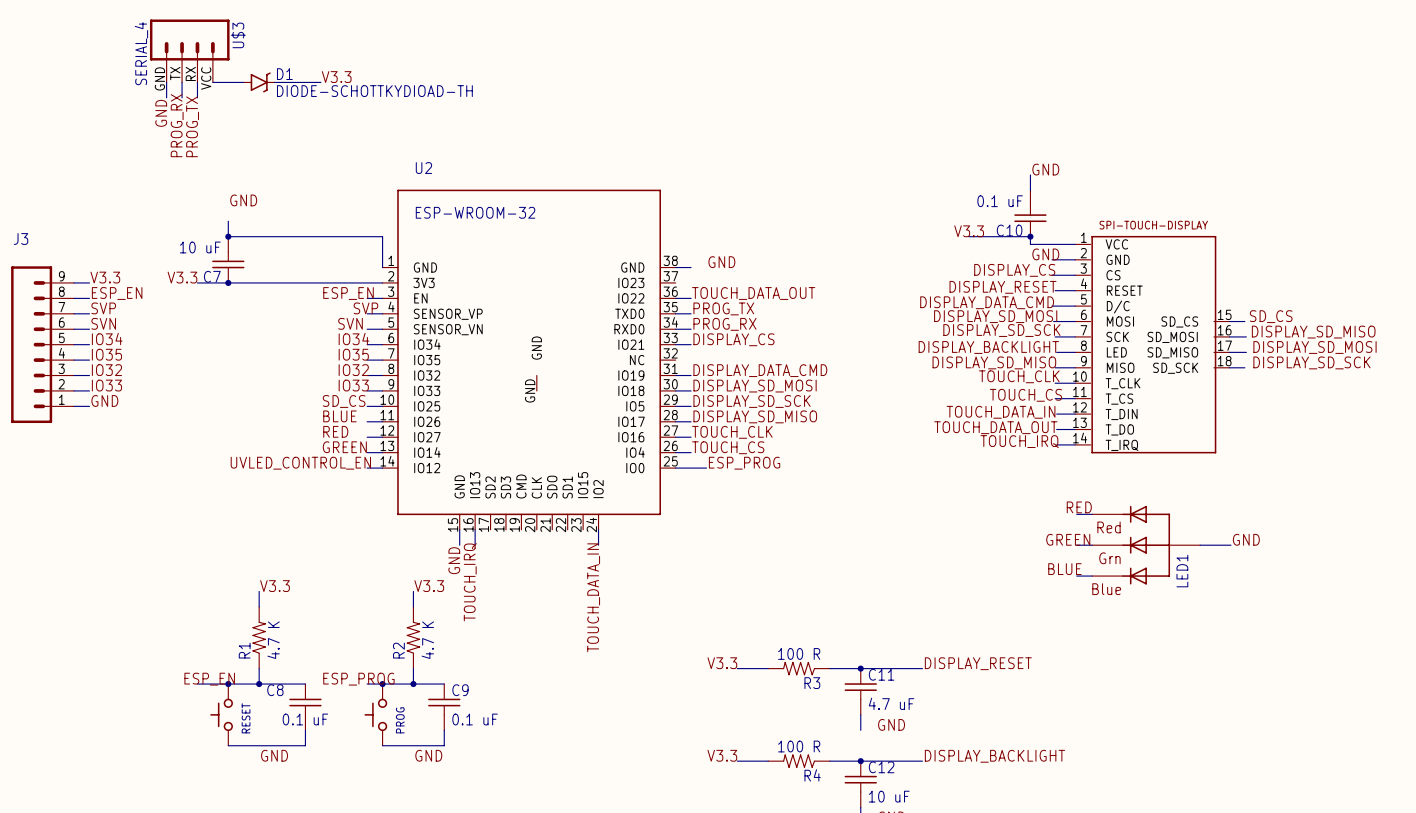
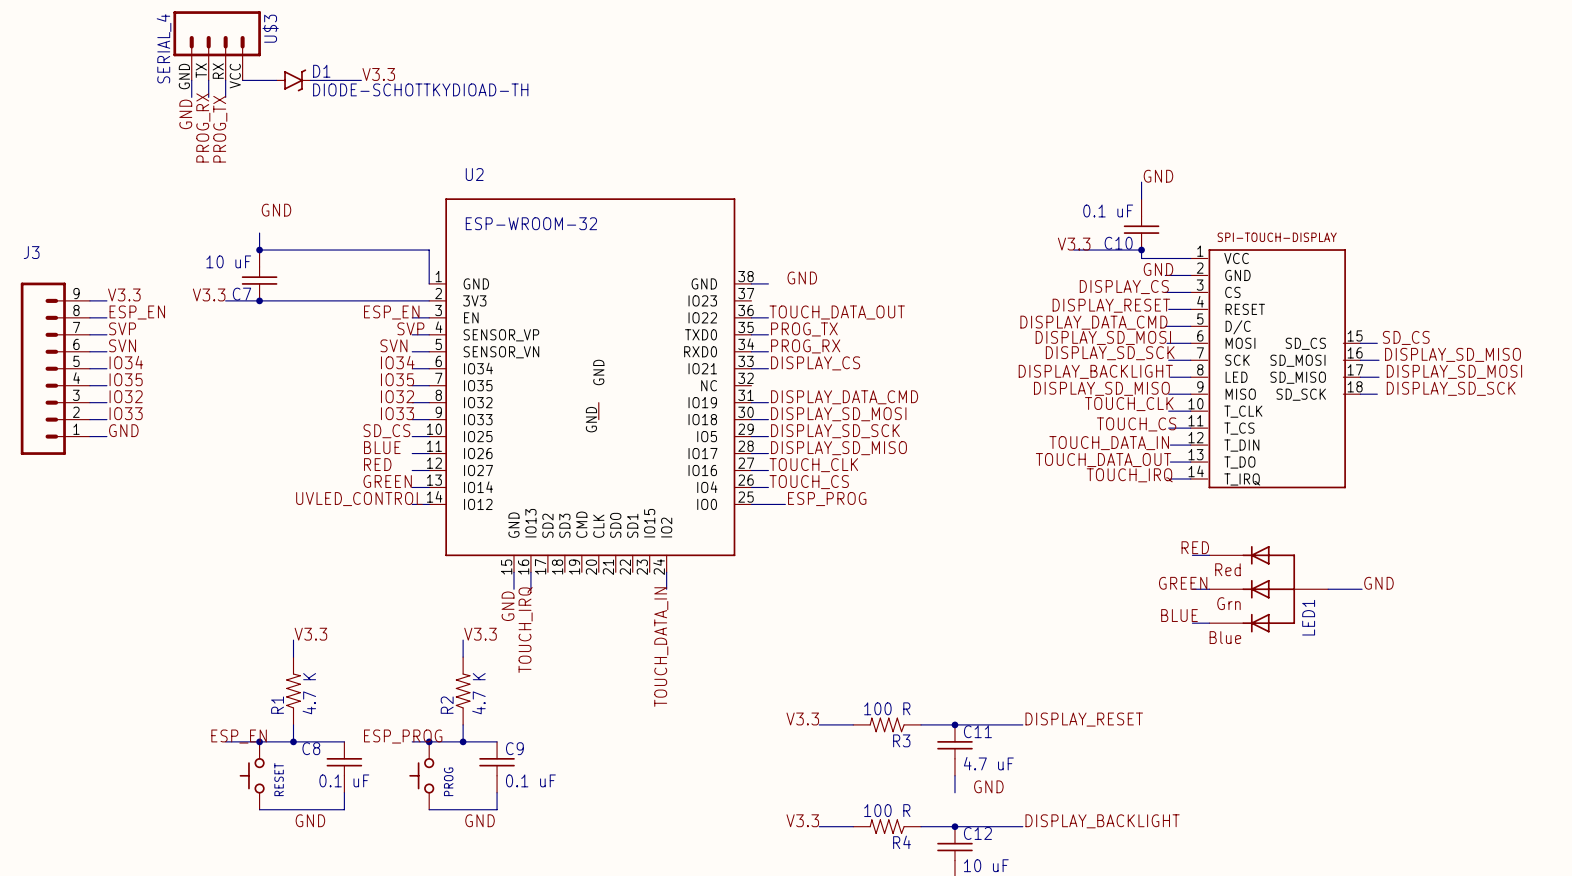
label: UVLED_CONTROL_EN (300, 463) -> UVLED_CONTROL (359, 499)

